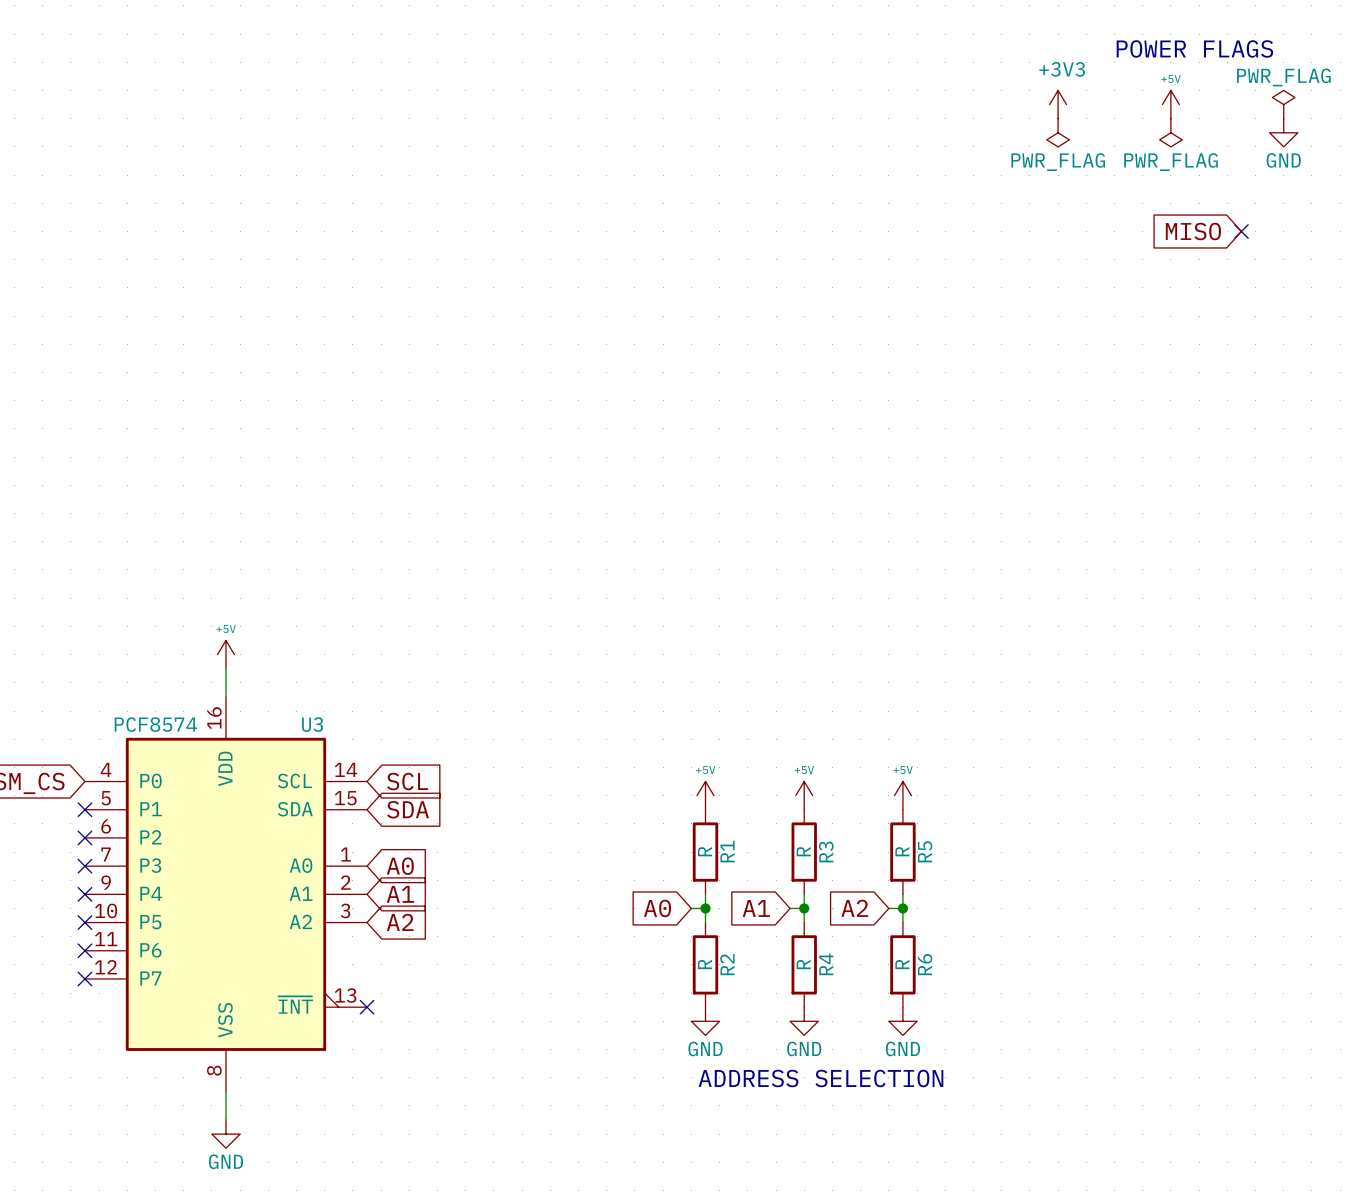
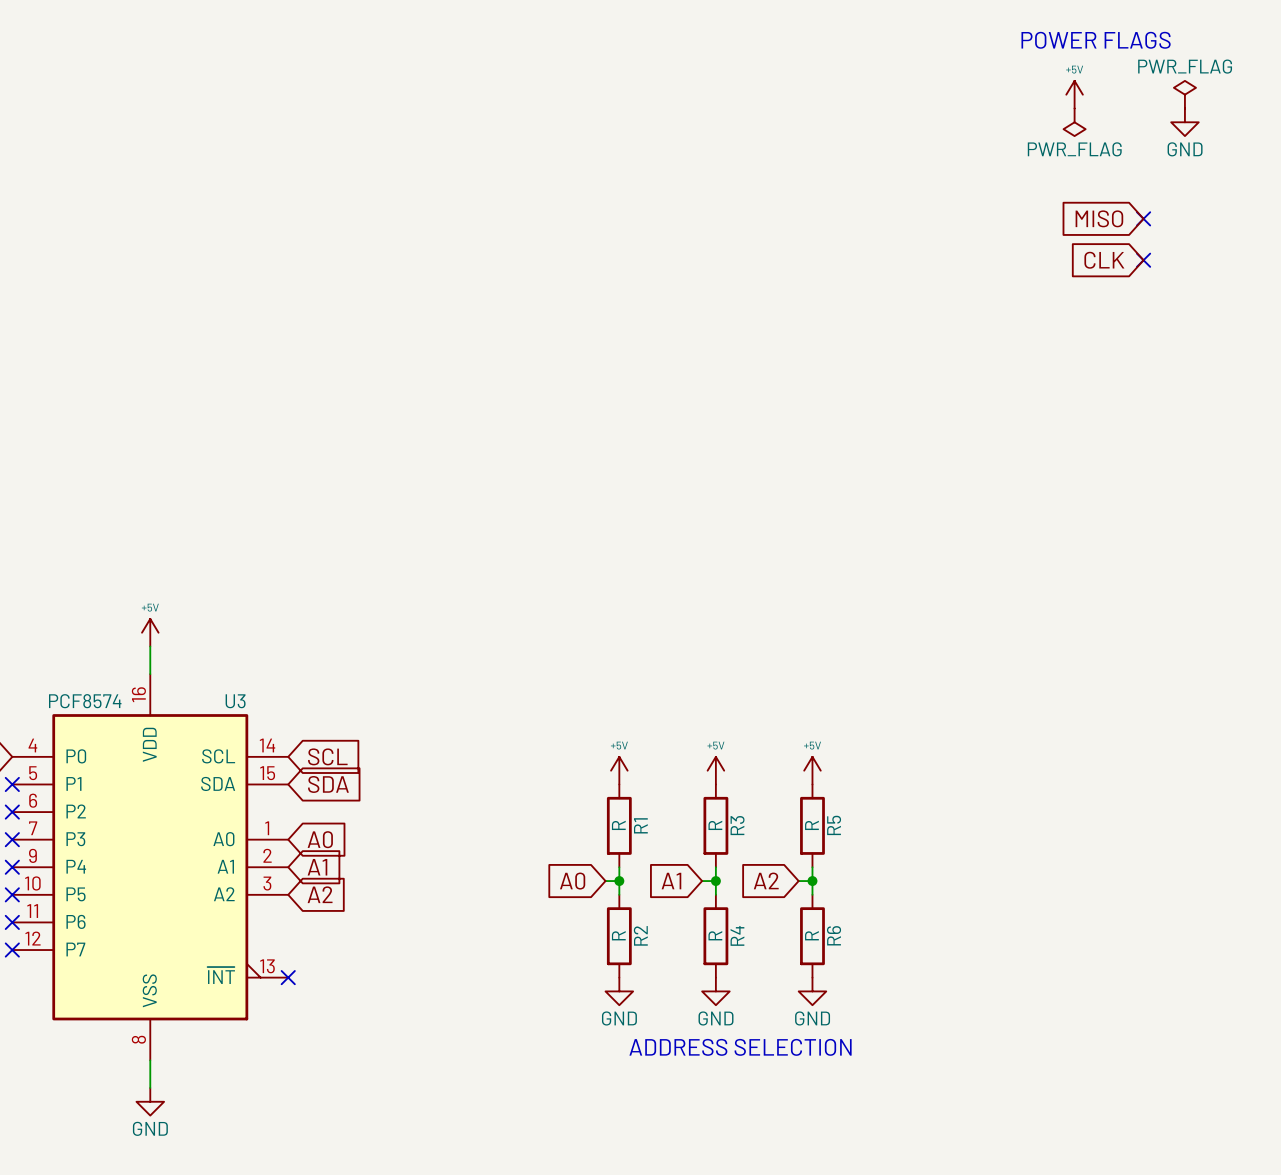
power symbol: +3V3 (1058, 104) -> none
power symbol: PWR_FLAG (1058, 132) -> none
global label: none -> CLK (1104, 260)
no-connect mark: none -> (1143, 260)

